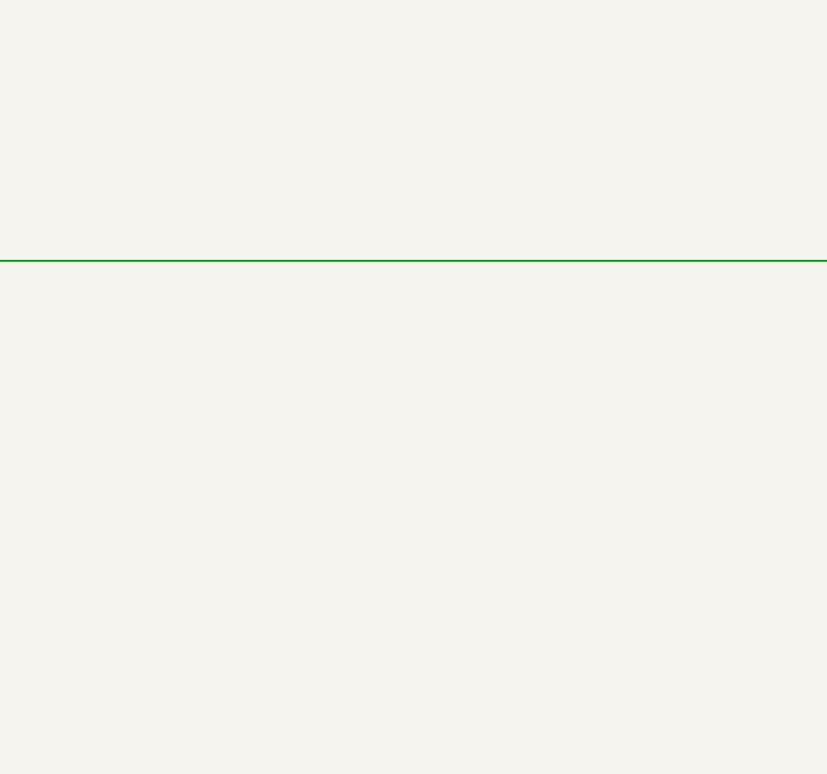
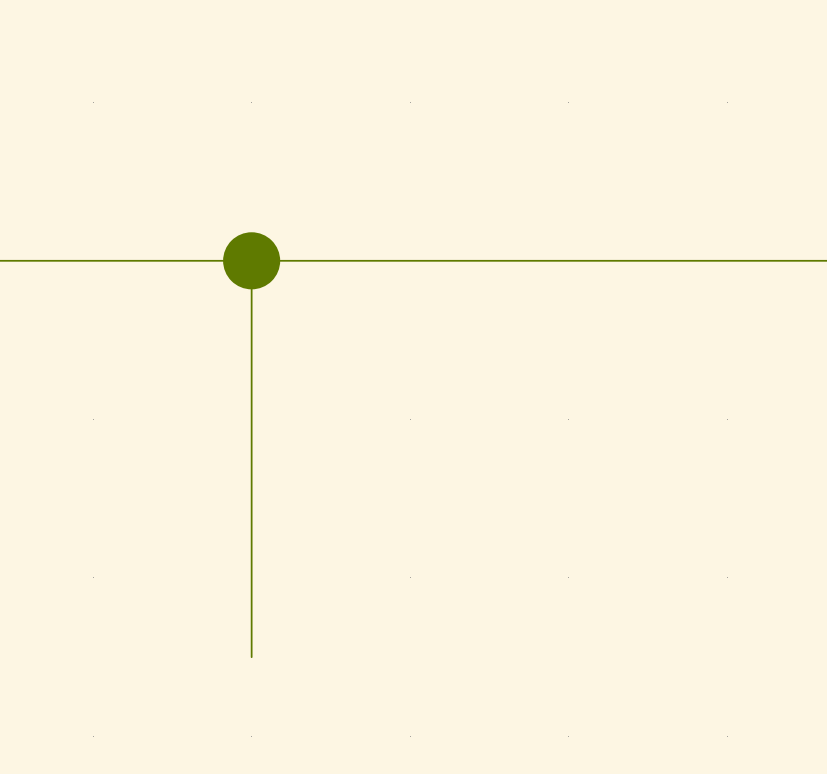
wire: none -> (251, 260) (251, 657)
junction: none -> (251, 260)

